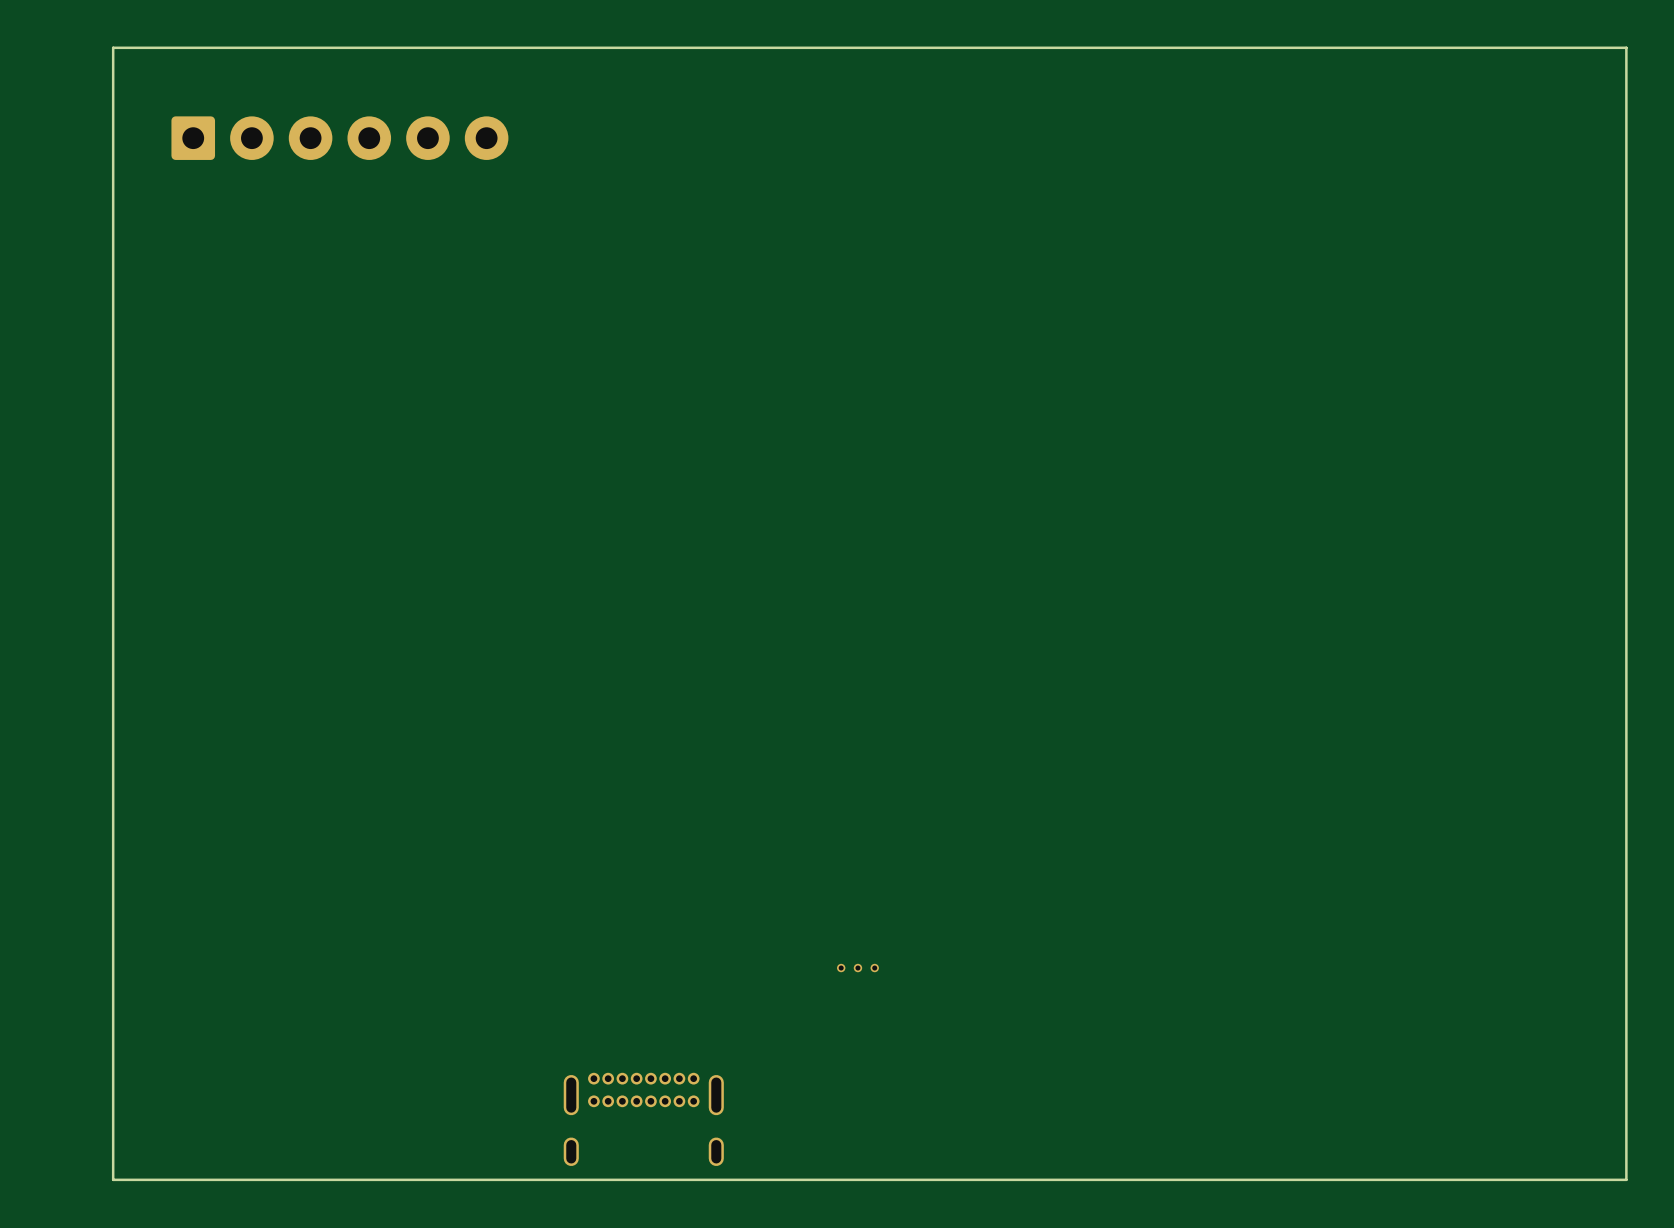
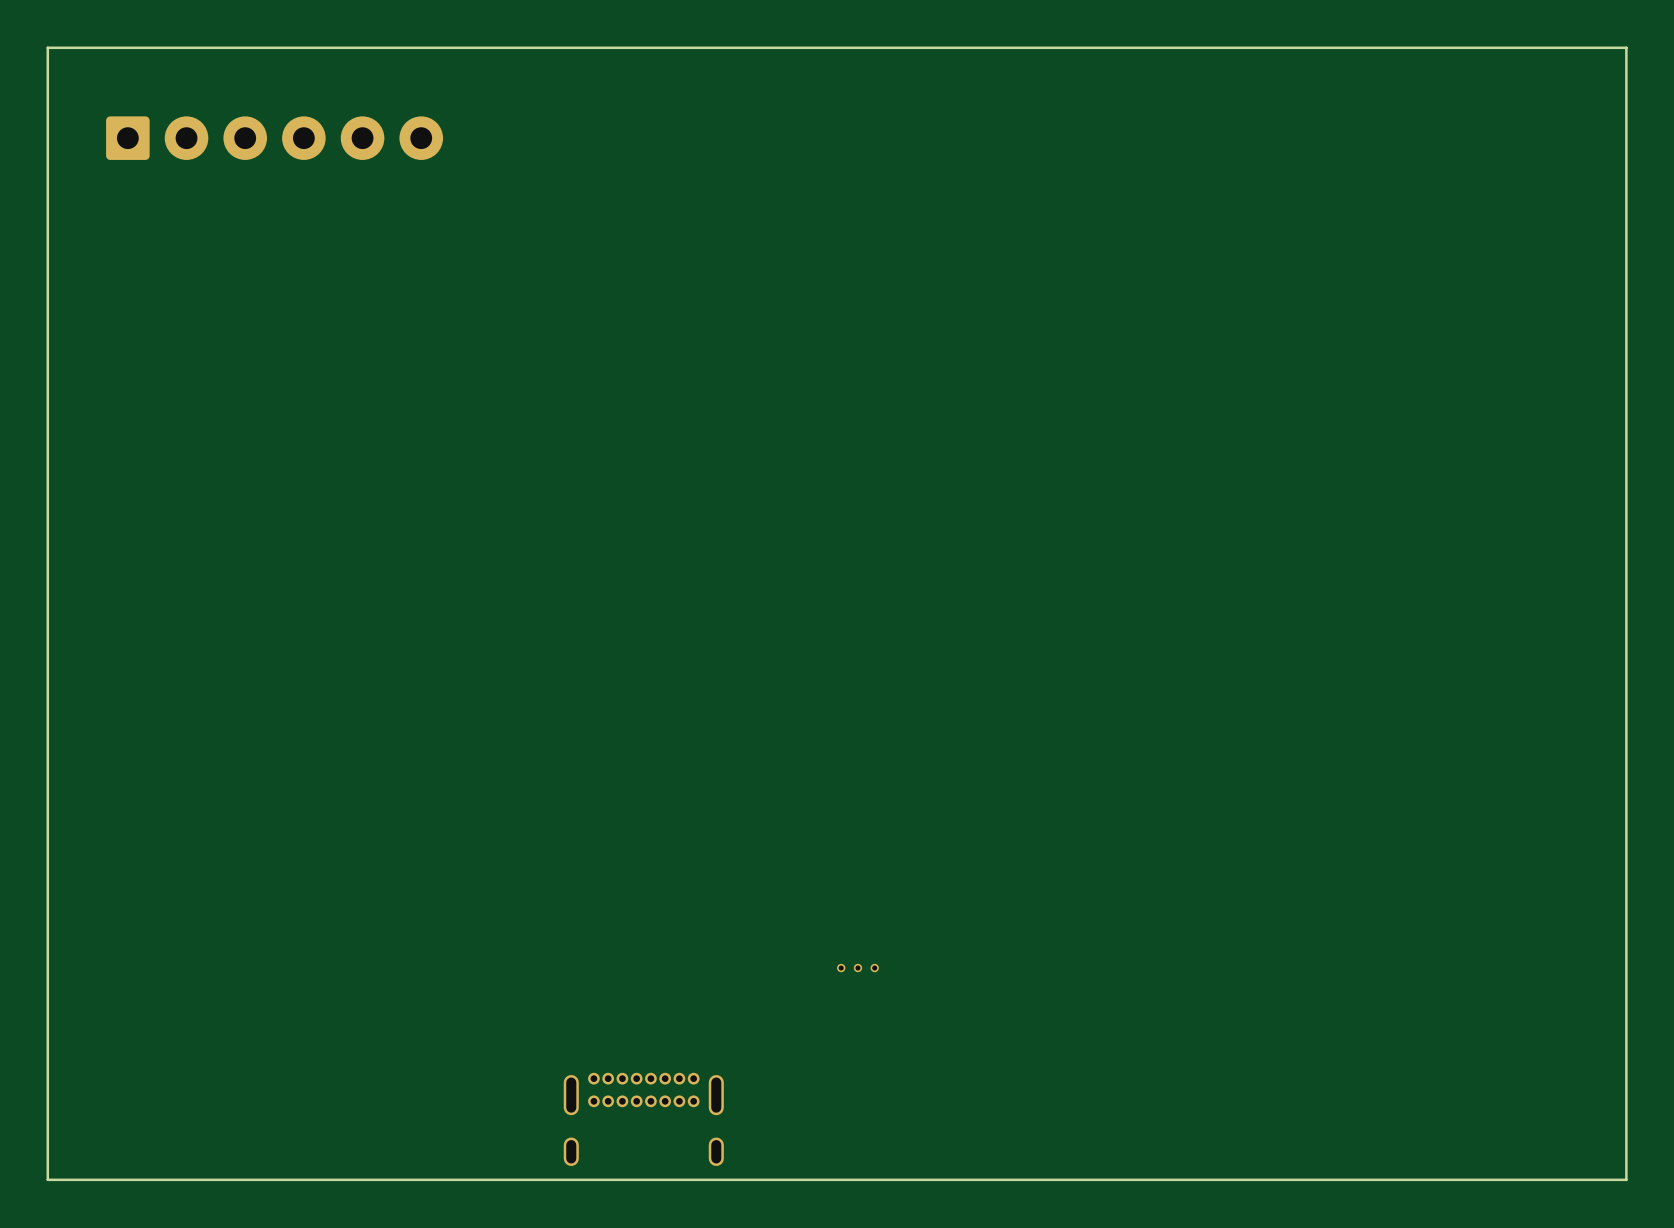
board edge: (113, 47) (113, 1179) -> (113, 47) (47, 47) (47, 1179) (113, 1179)
part position: (339, 138) -> (274, 138)

